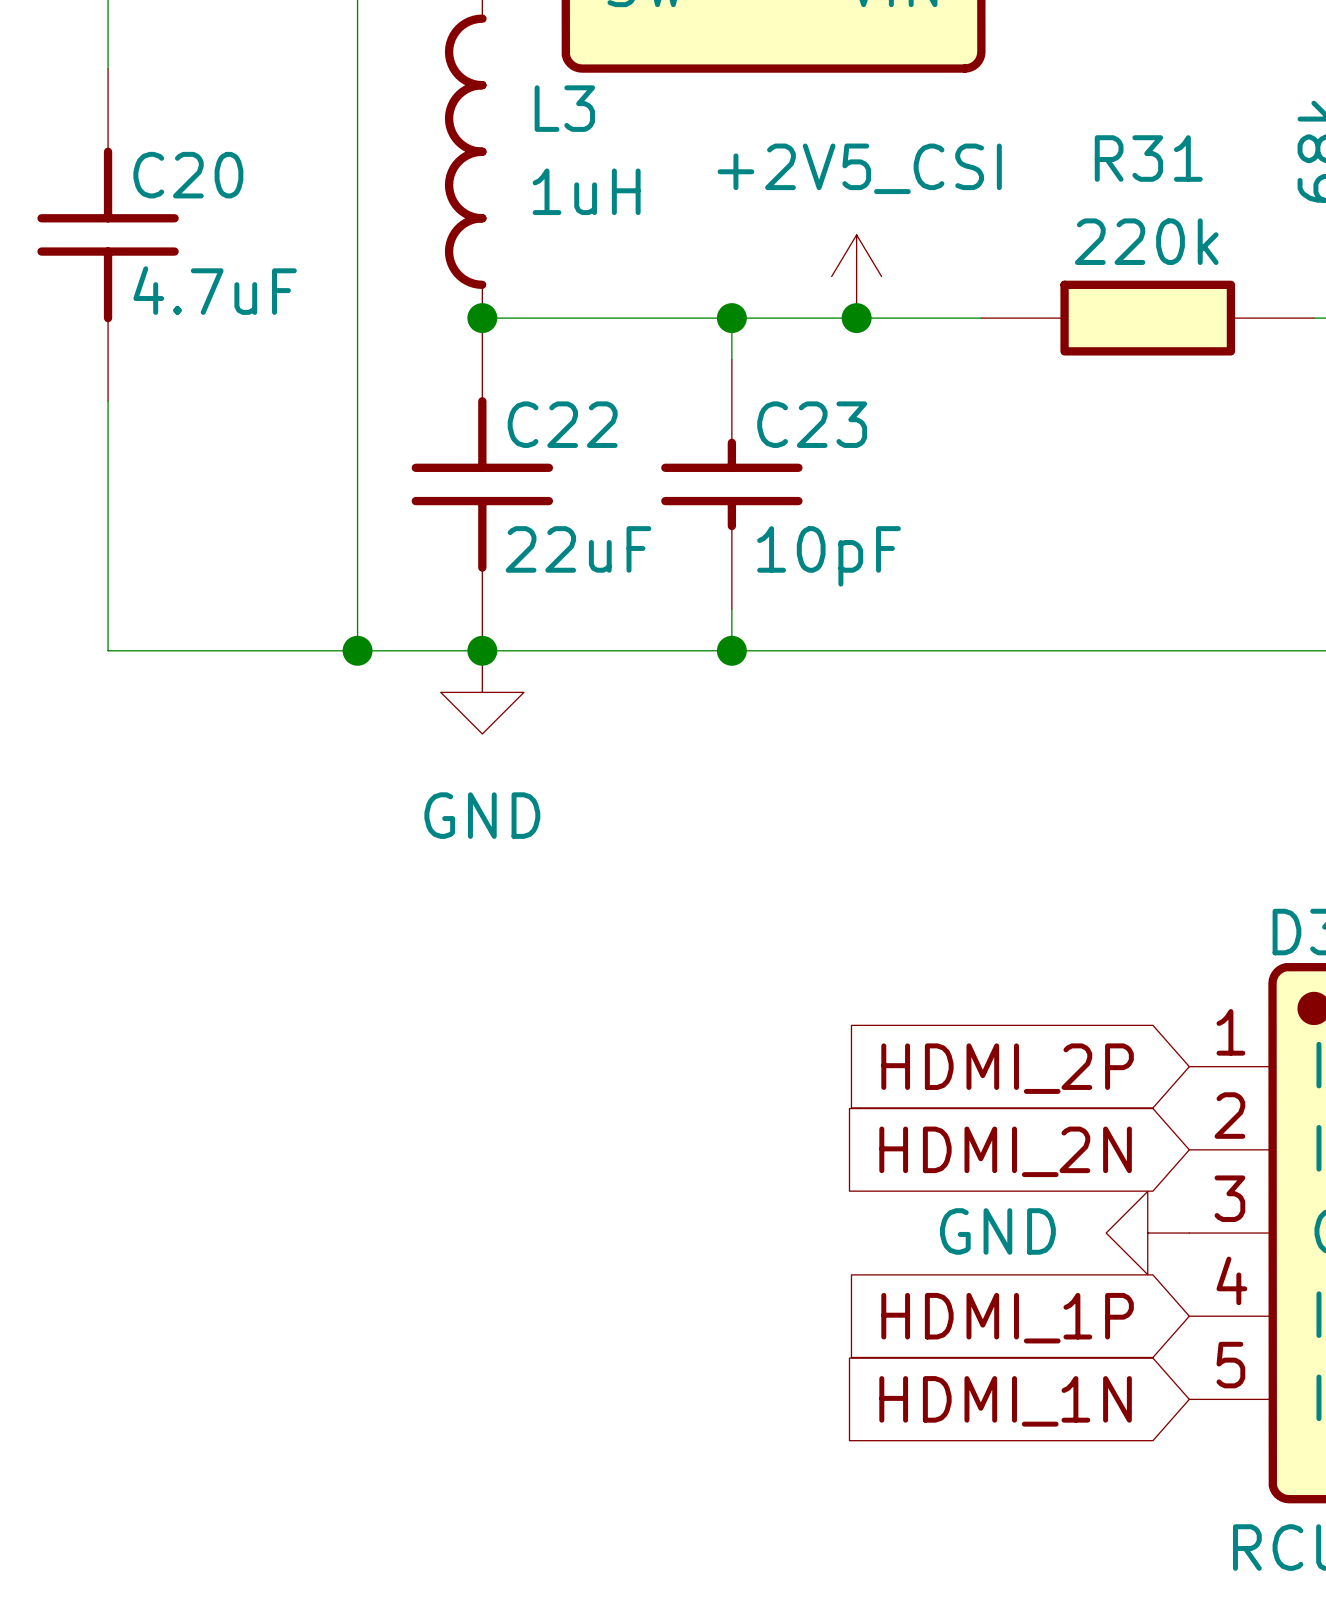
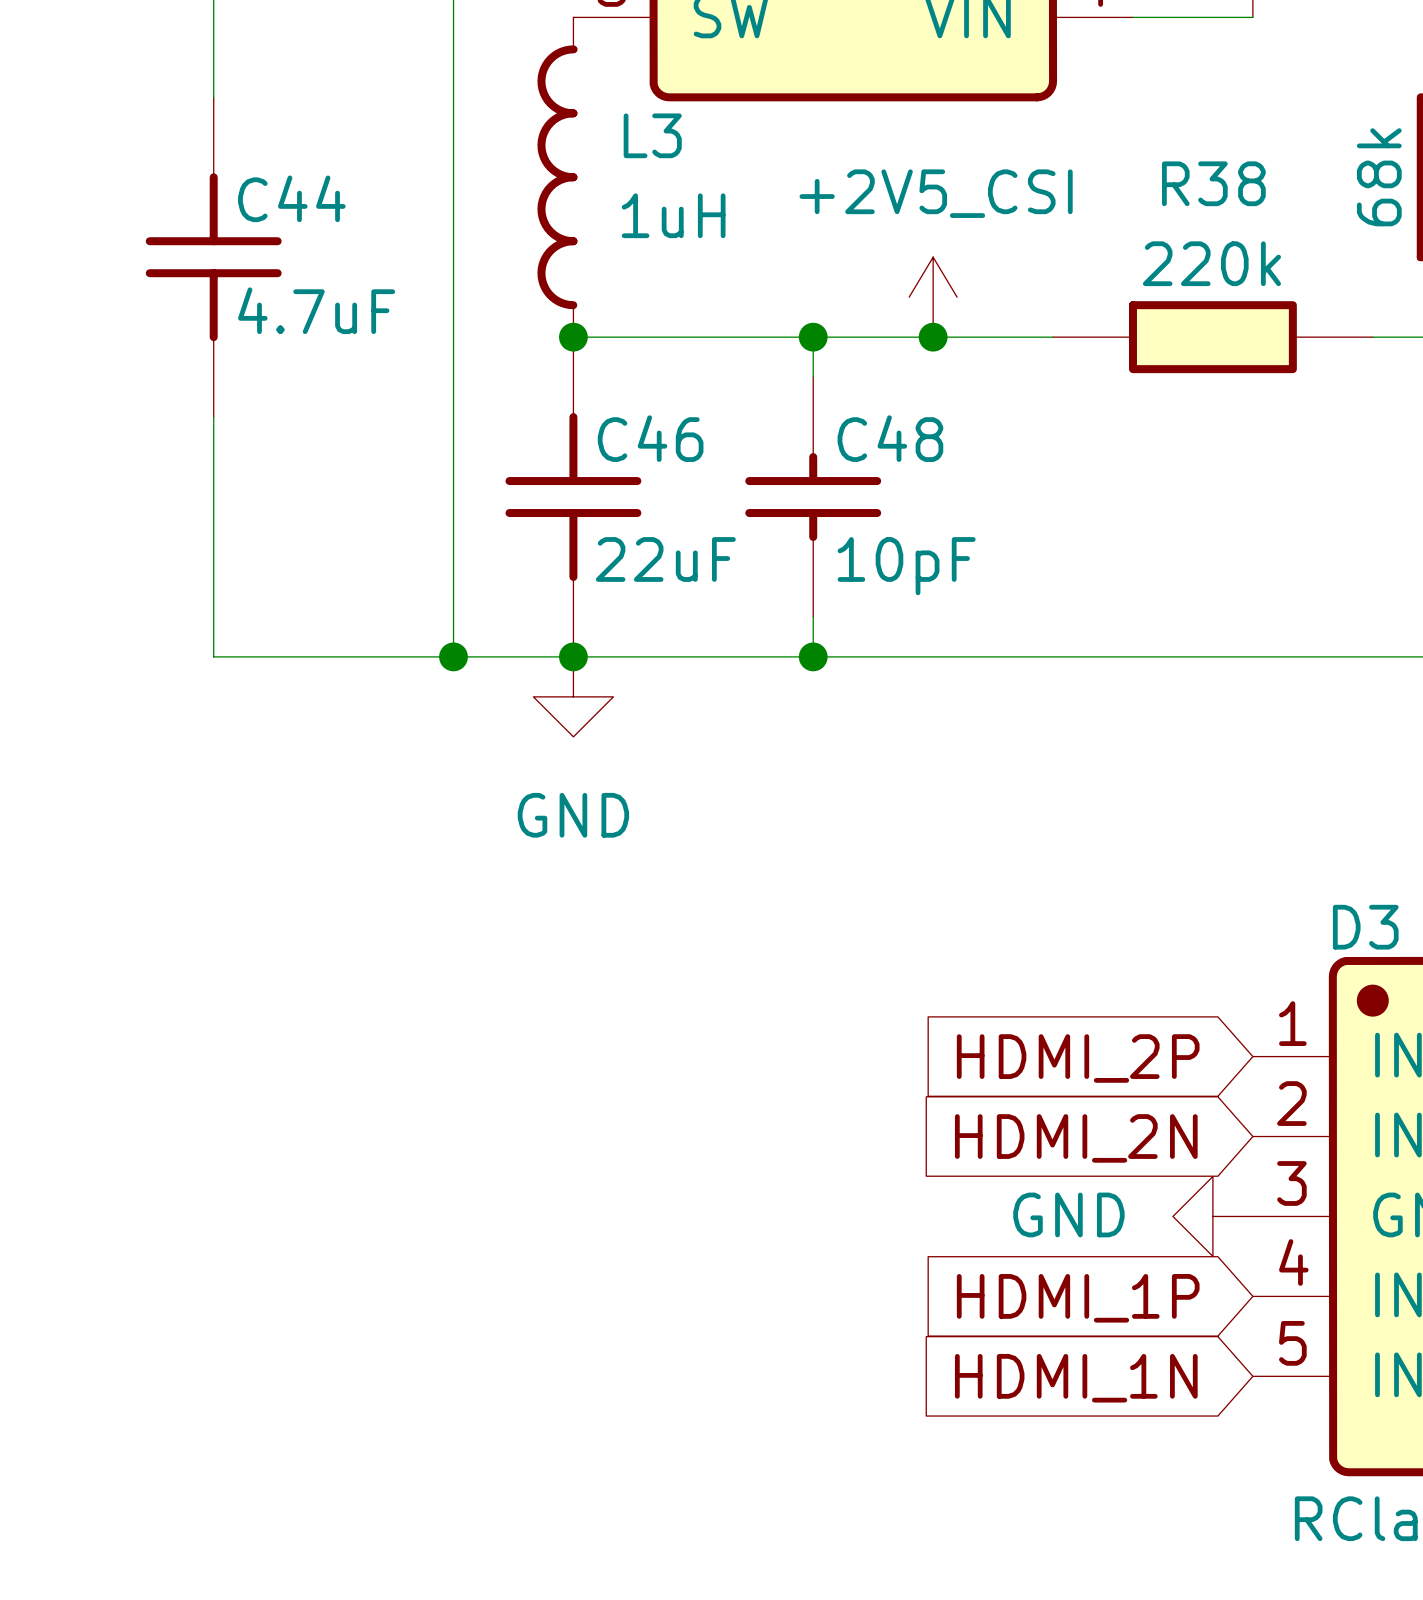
R31 name: R31 (1148, 158) -> R38 (1213, 183)
C20 name: C20 (188, 175) -> C44 (291, 198)
C22 name: C22 (562, 424) -> C46 (650, 438)
C23 name: C23 (812, 424) -> C48 (890, 438)

